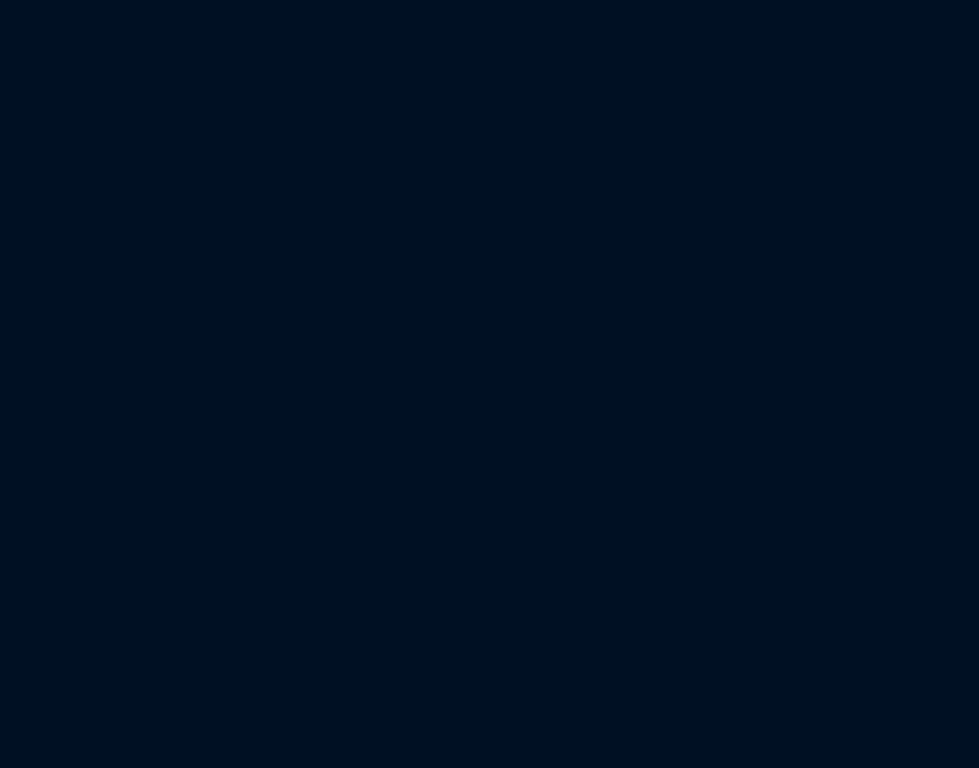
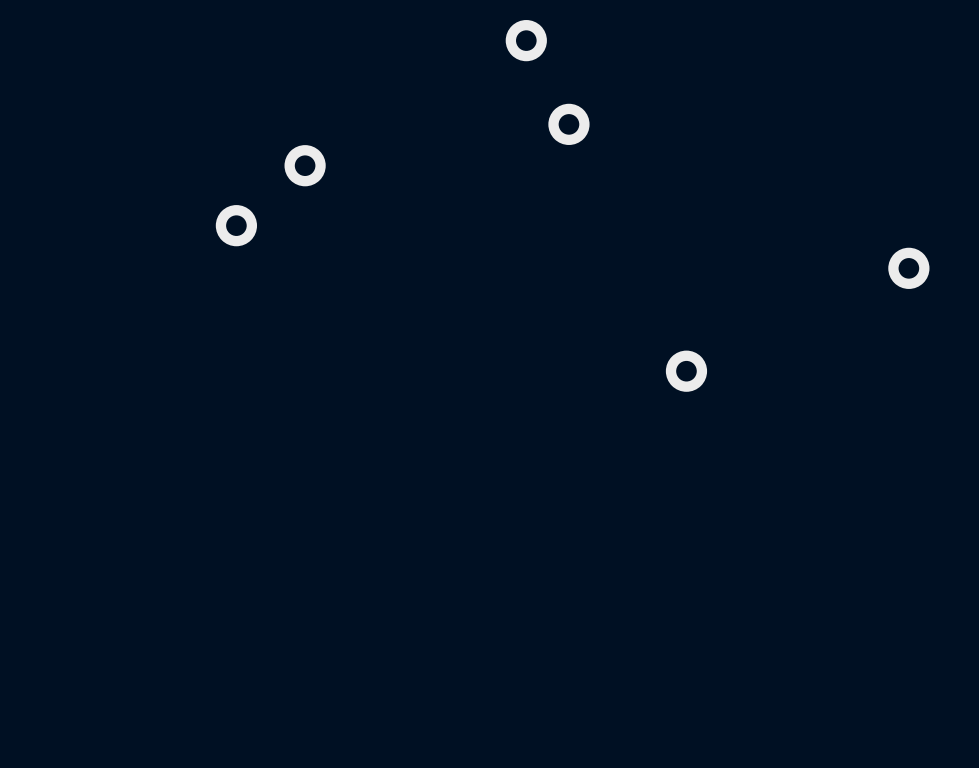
via: none -> (526, 40)
via: none -> (568, 124)
via: none -> (305, 165)
via: none -> (236, 225)
via: none -> (908, 268)
via: none -> (686, 371)

